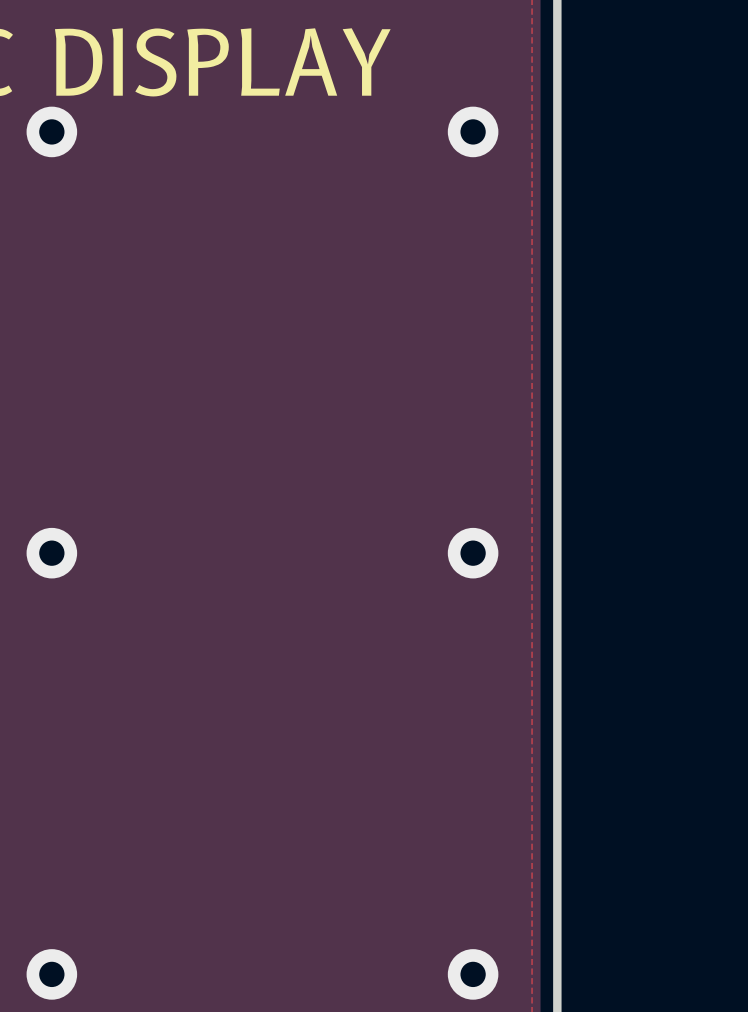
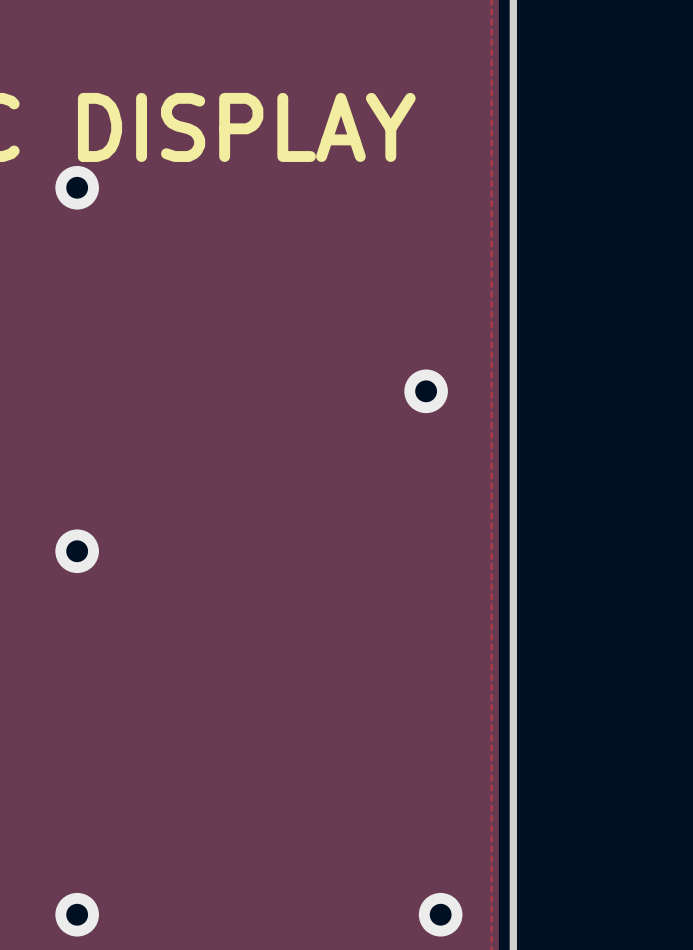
via: (473, 131) -> none
via: none -> (426, 391)
via: (473, 553) -> none

